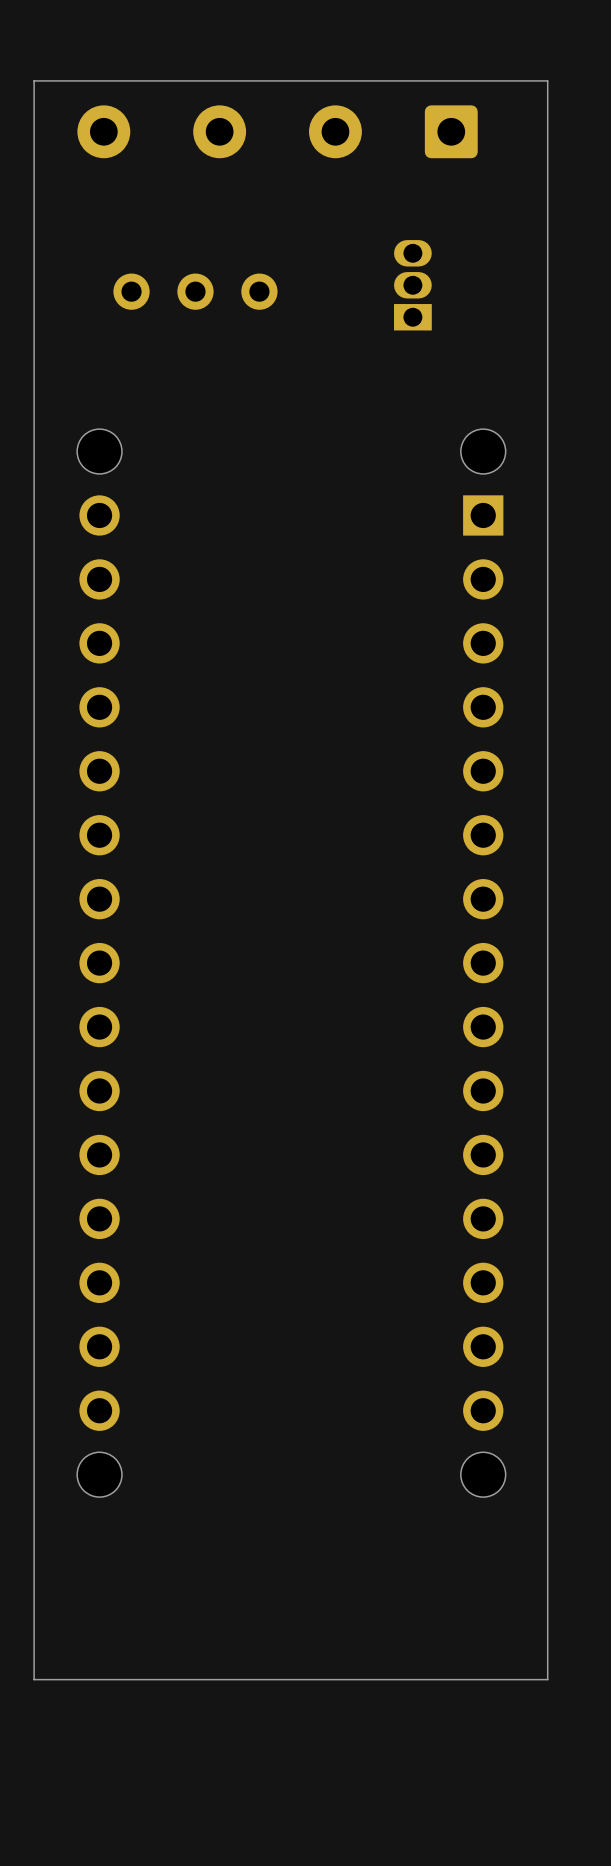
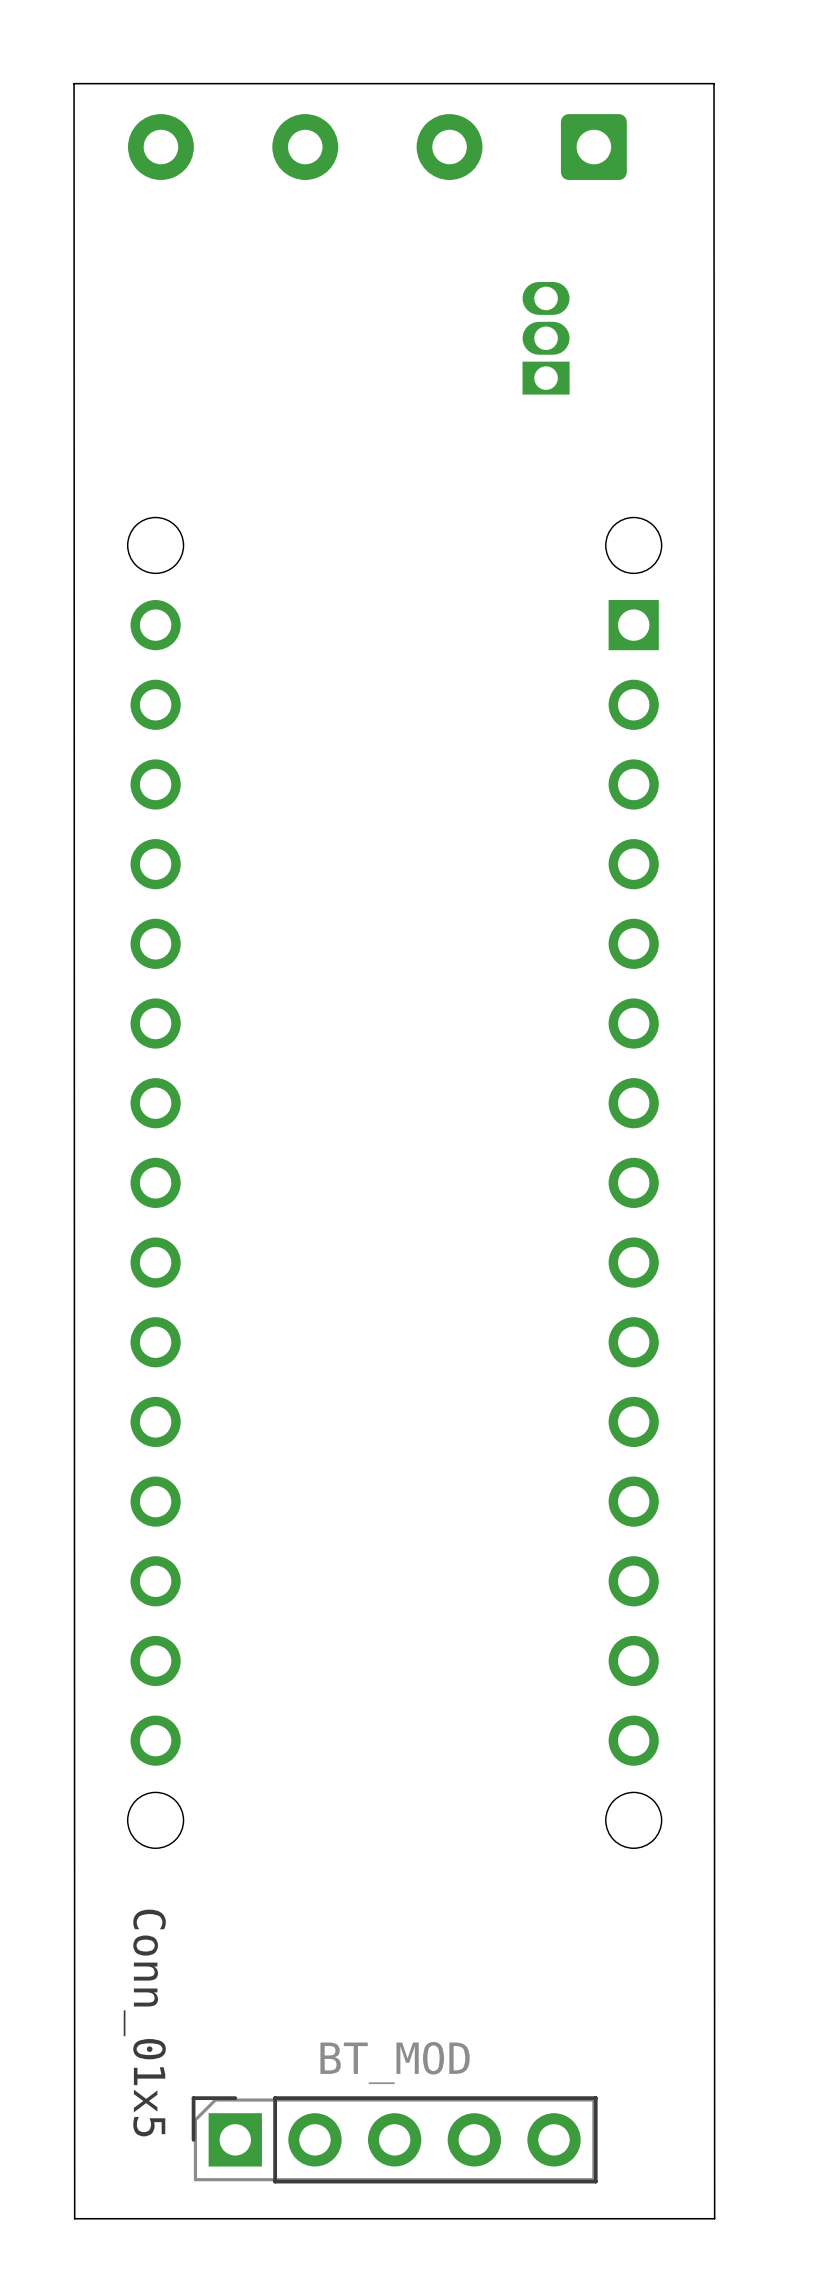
board edge: (547, 80) (547, 1679) (34, 1679) (34, 80) -> (714, 83) (714, 2218) (74, 2218) (74, 83)
part: (195, 291) -> none
Conn_01x5: none -> BT_MOD (394, 2139)

